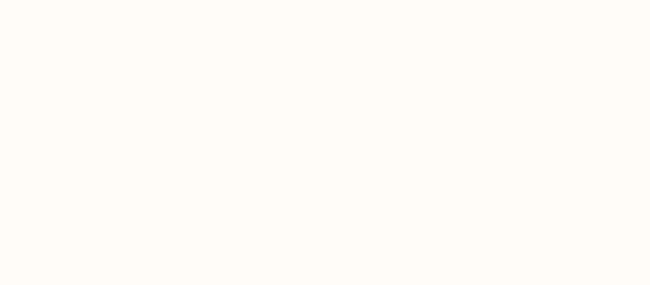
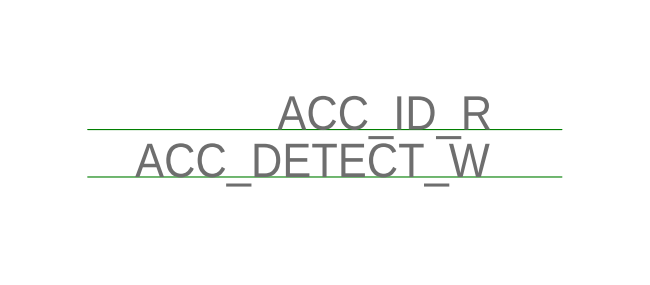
label: none -> ACC_ID_R (383, 117)
wire: none -> (87, 129) (561, 129)
label: none -> ACC_DETECT_W (312, 164)
wire: none -> (87, 176) (561, 176)

